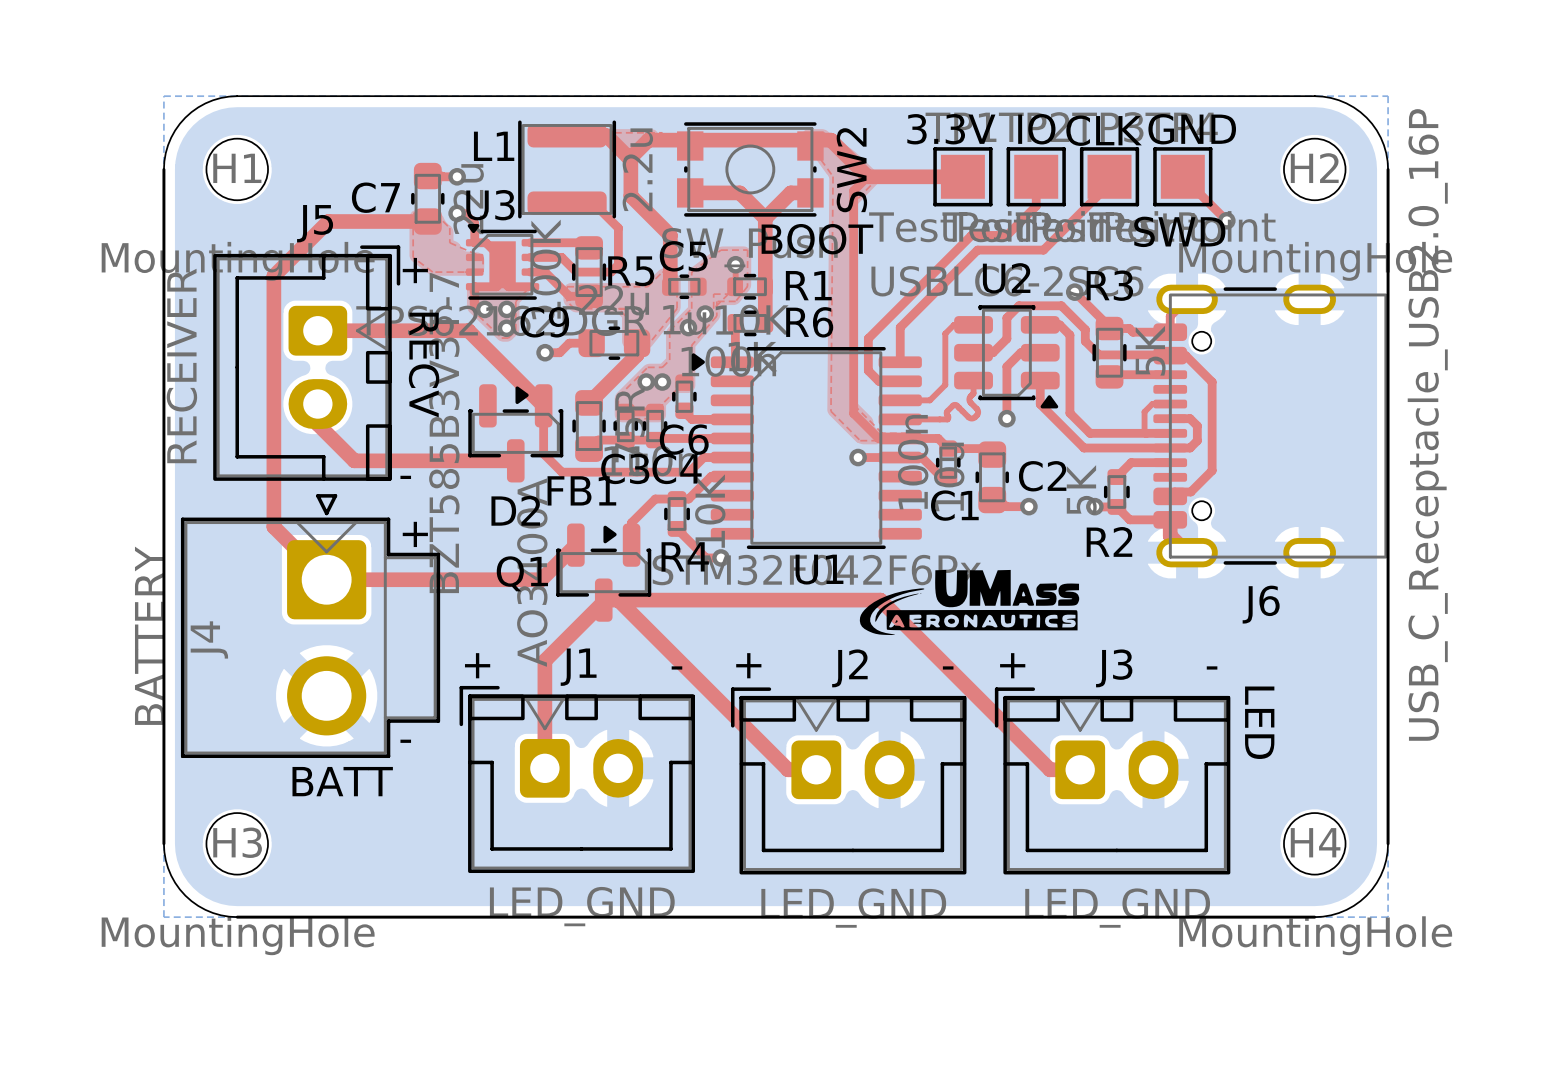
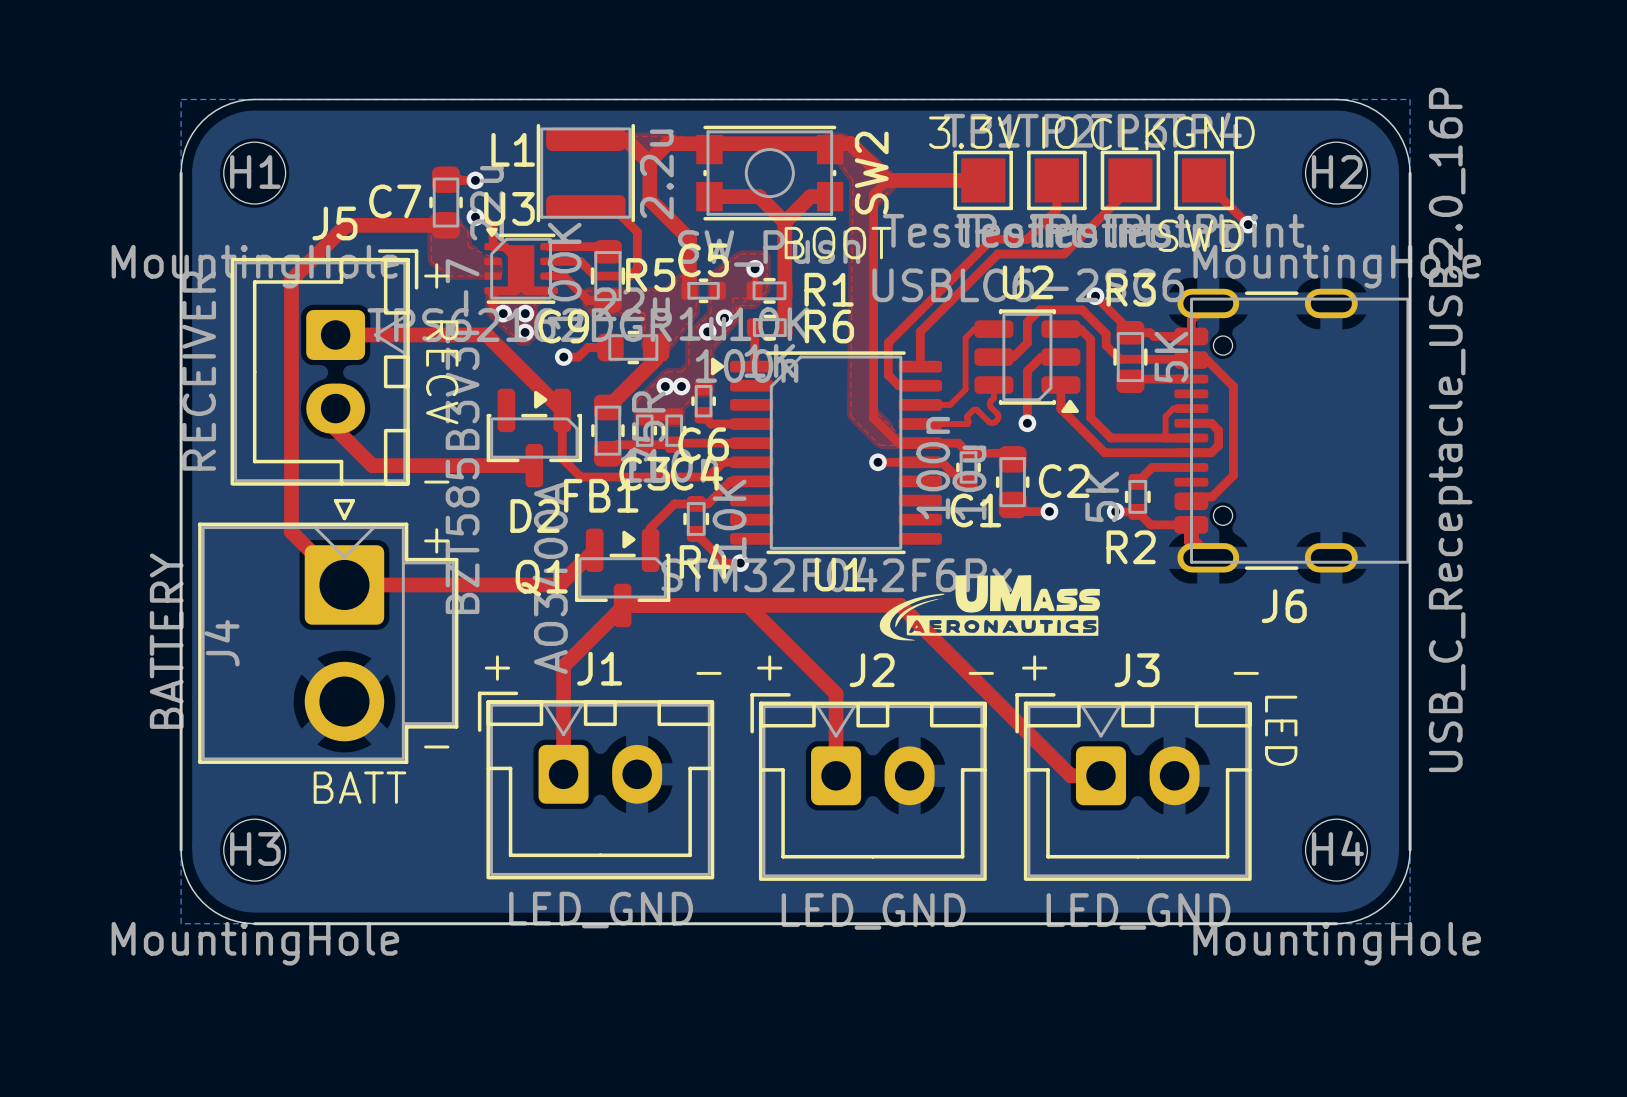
top track: (618, 600) (788, 769) (816, 769) -> (747, 605) (836, 693) (836, 775)

